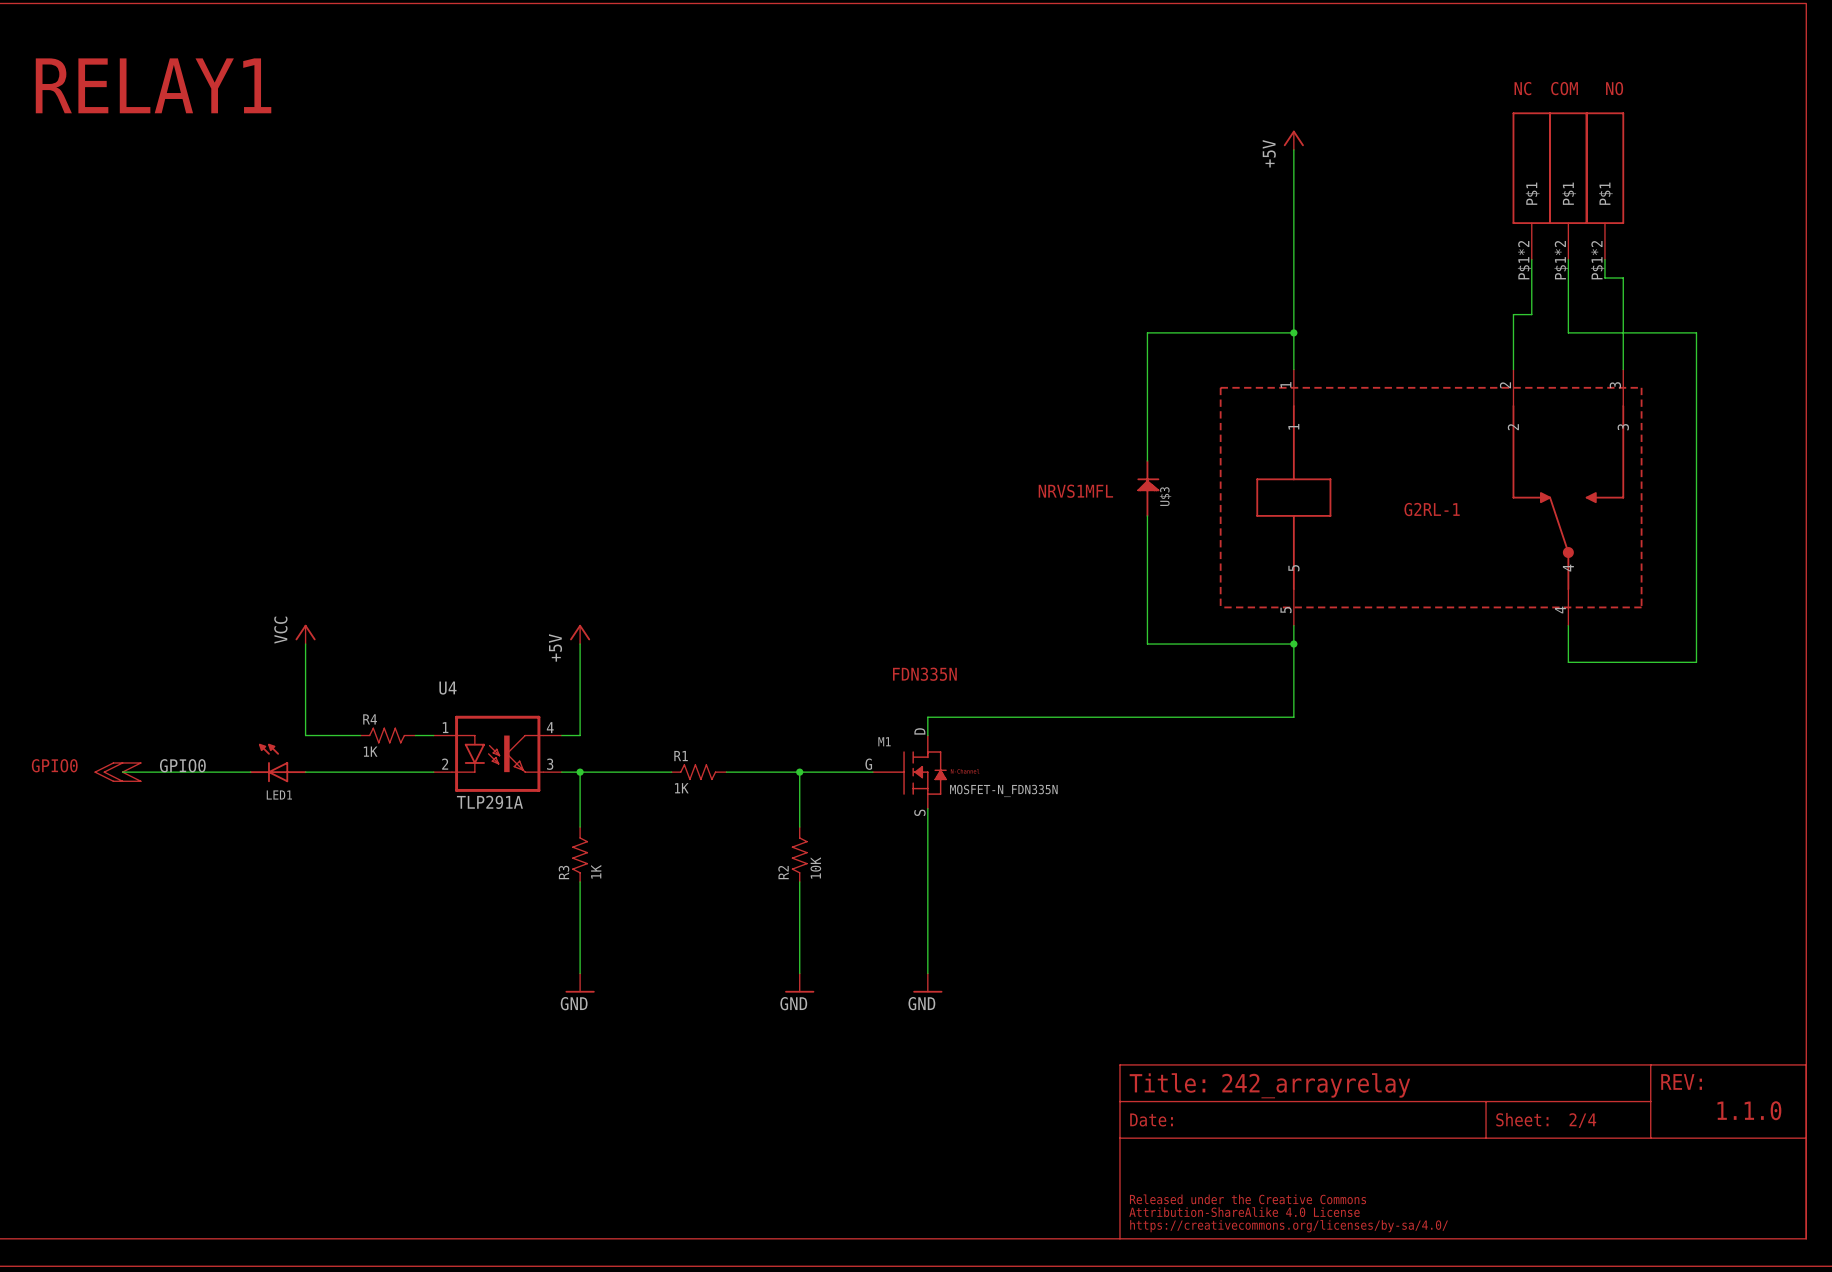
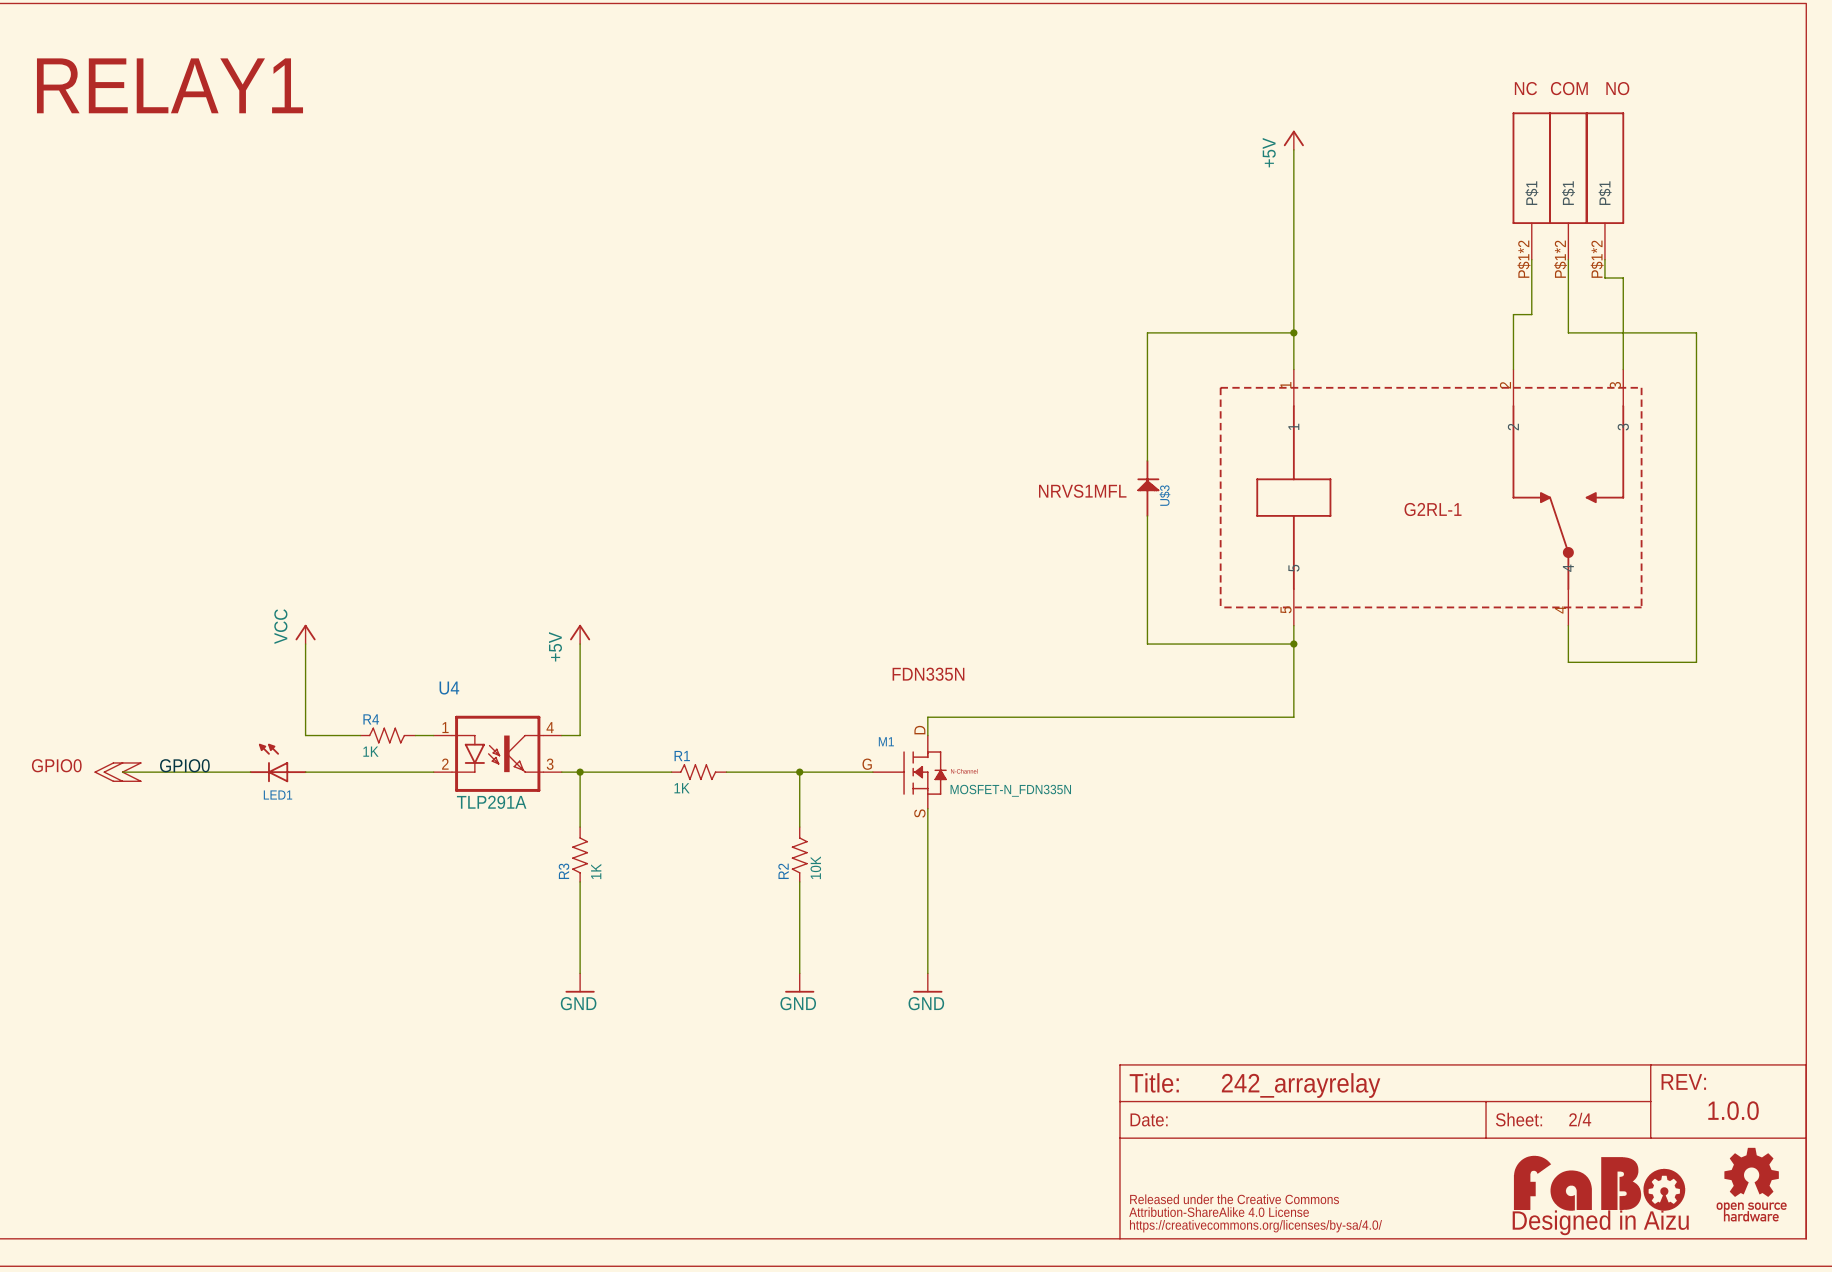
text: none -> 1.0.0 (1733, 1110)
text: 1.1.0 (1749, 1110) -> none
part: none -> (1599, 1183)
part: none -> (1751, 1184)

